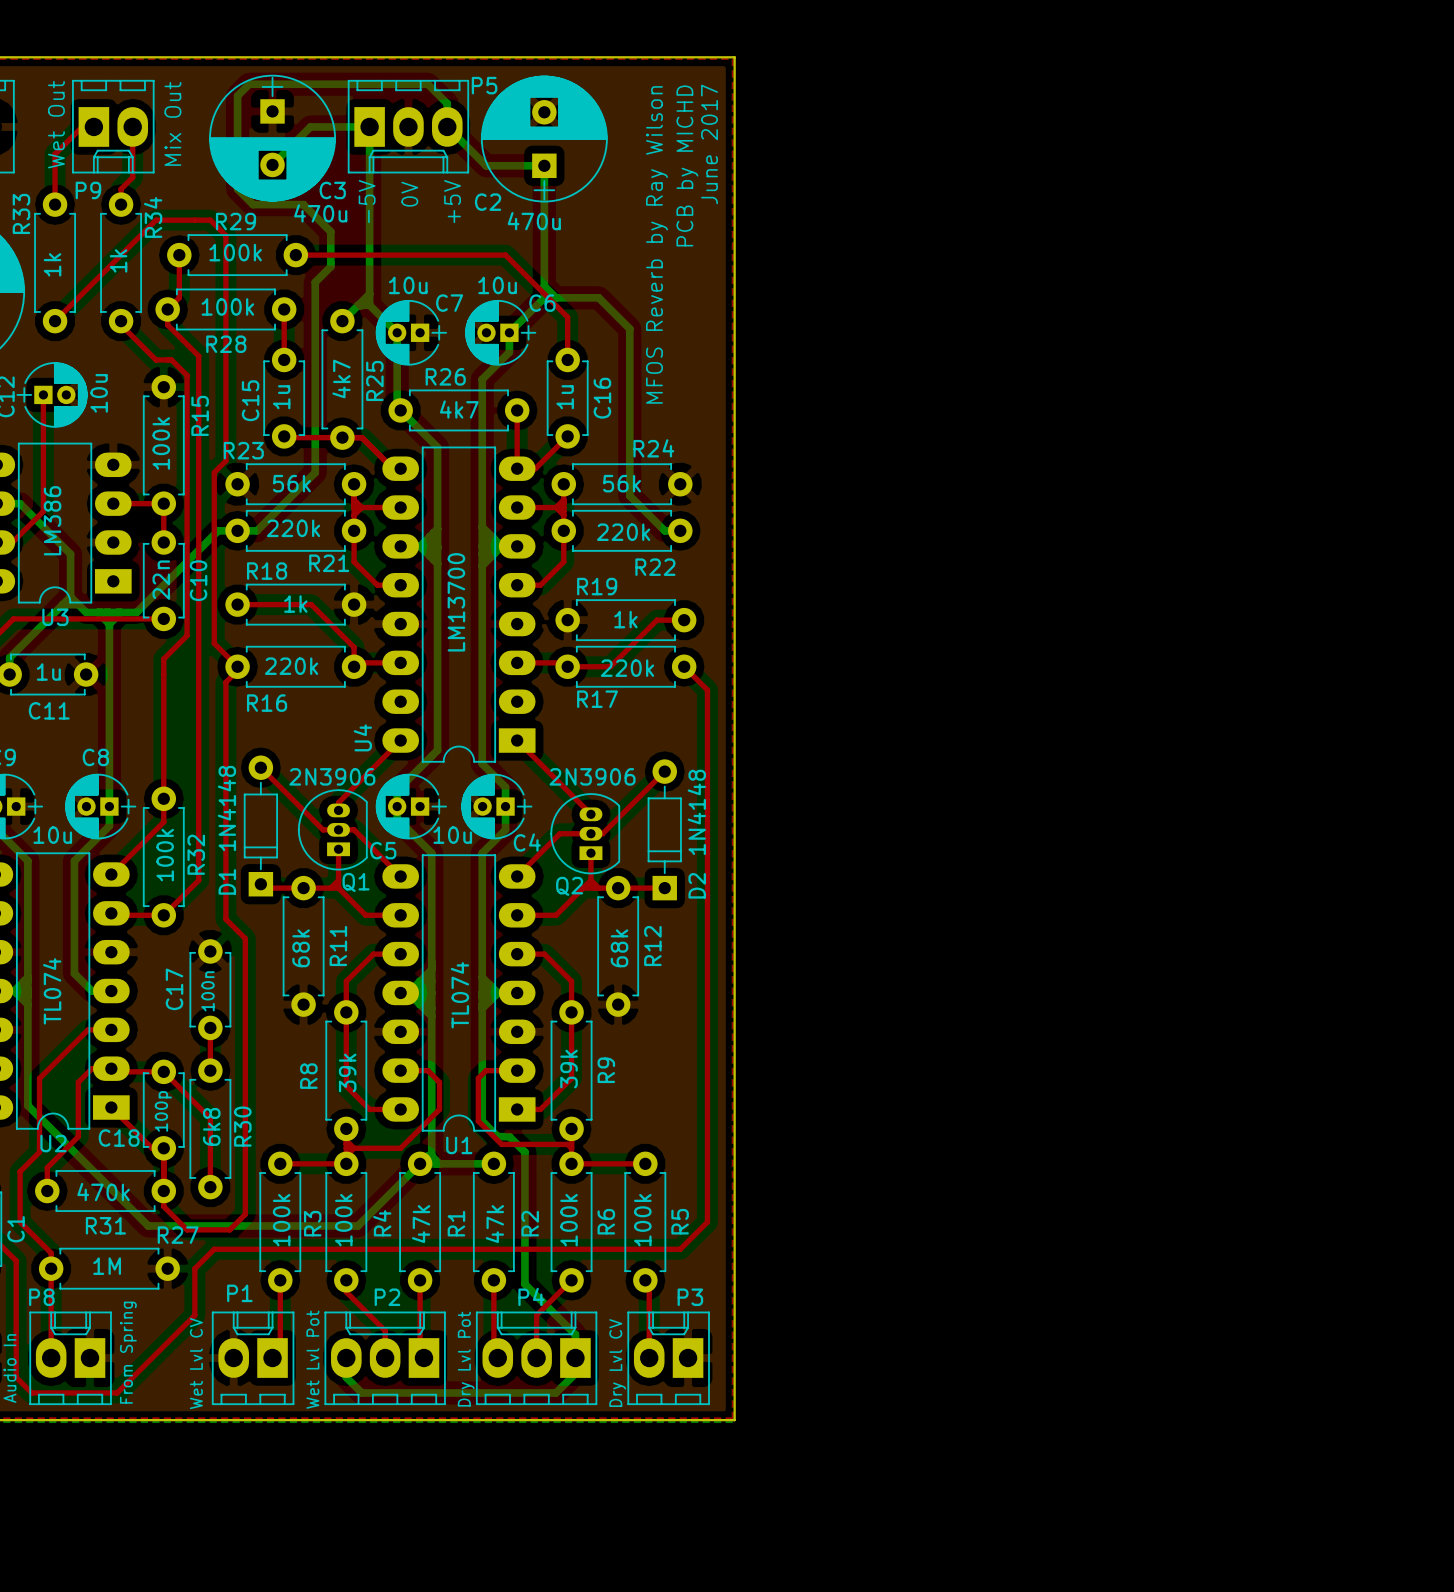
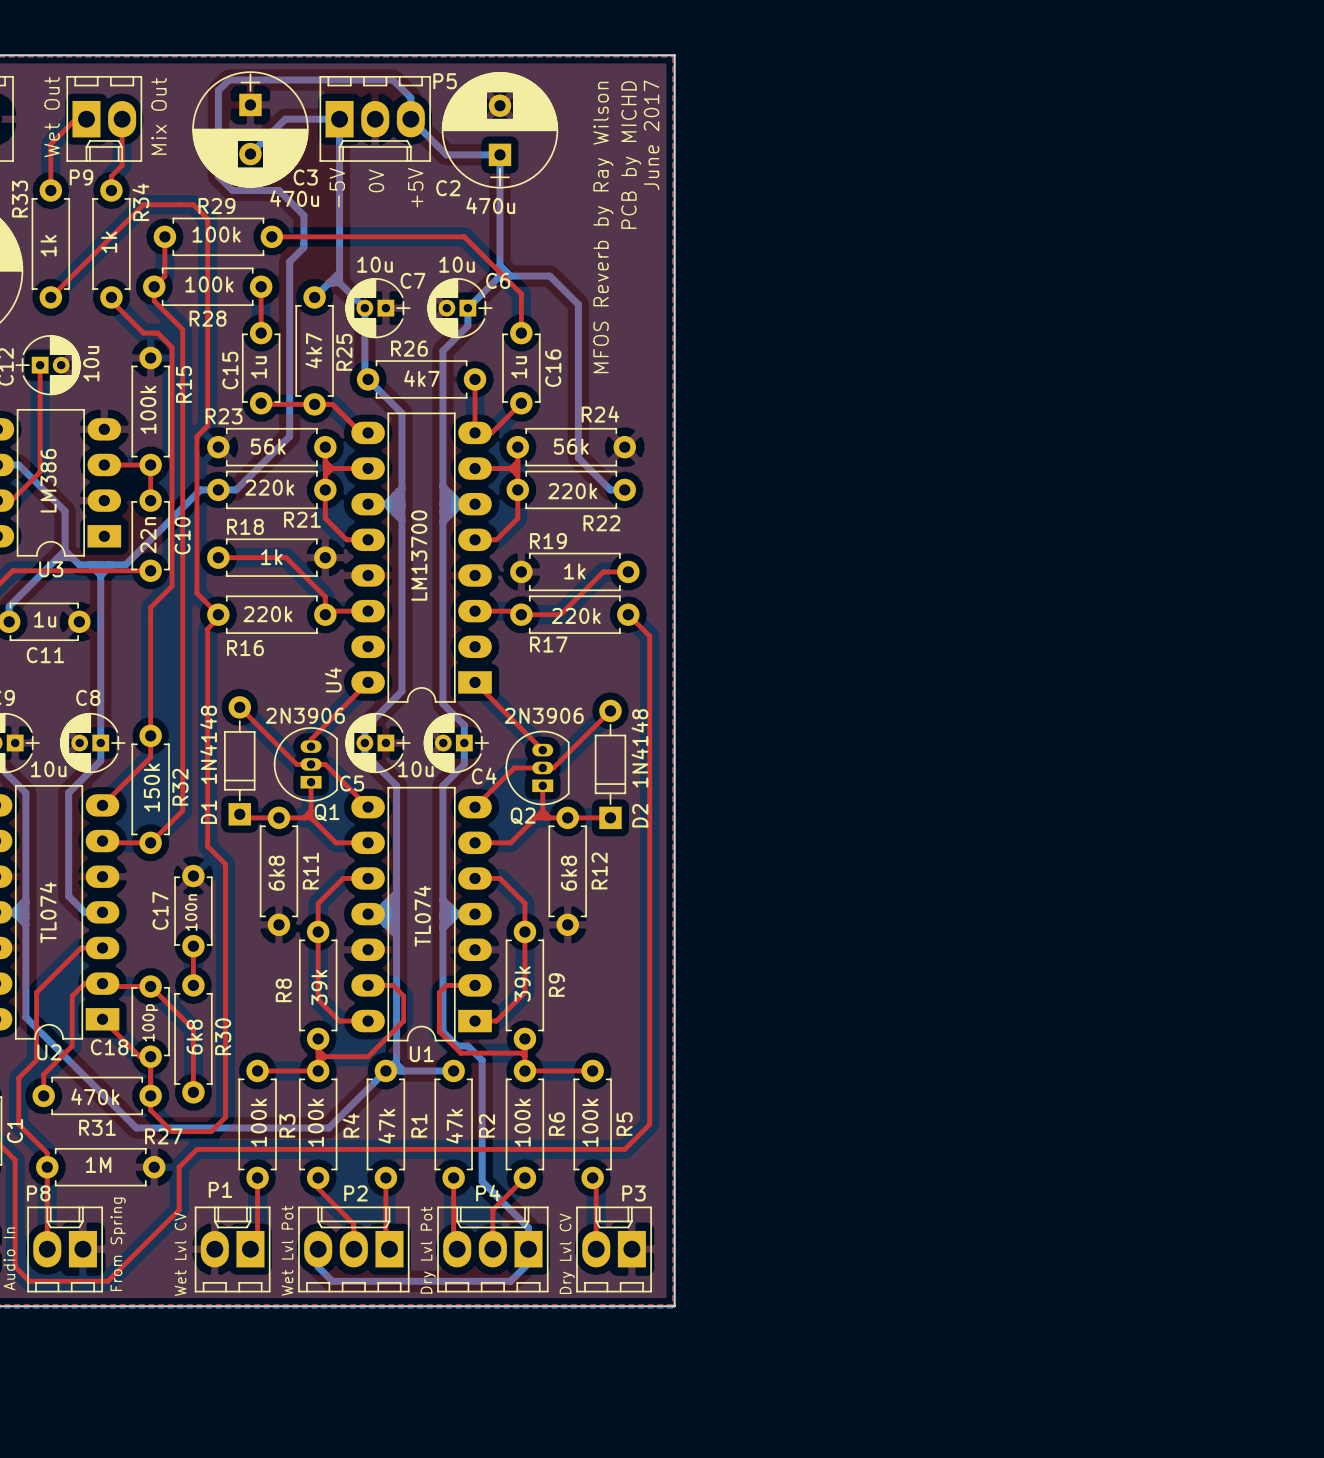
R32 value: 100k (165, 855) -> 150k (151, 787)
R11 value: 68k (301, 948) -> 6k8 (276, 873)
R12 value: 68k (619, 948) -> 6k8 (568, 873)

